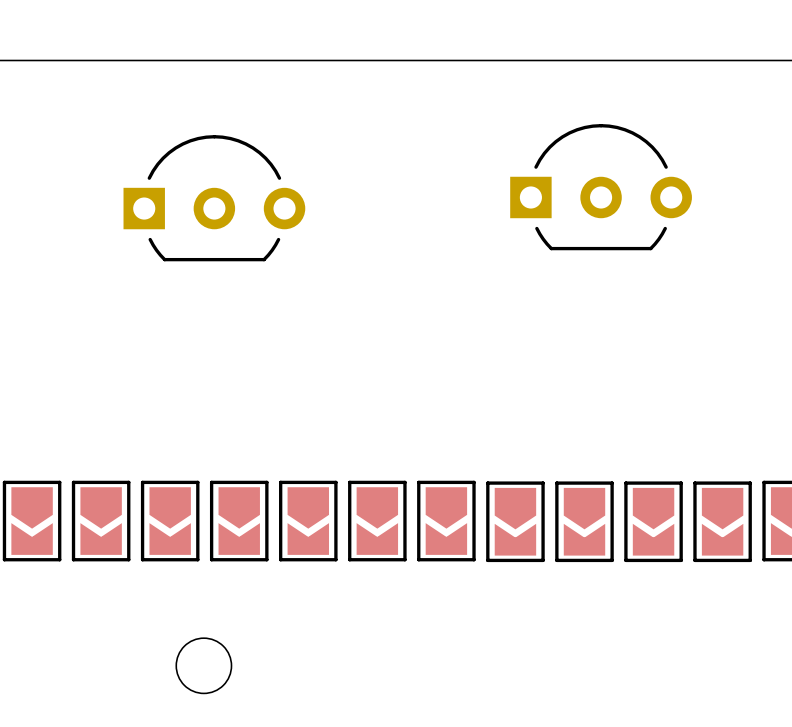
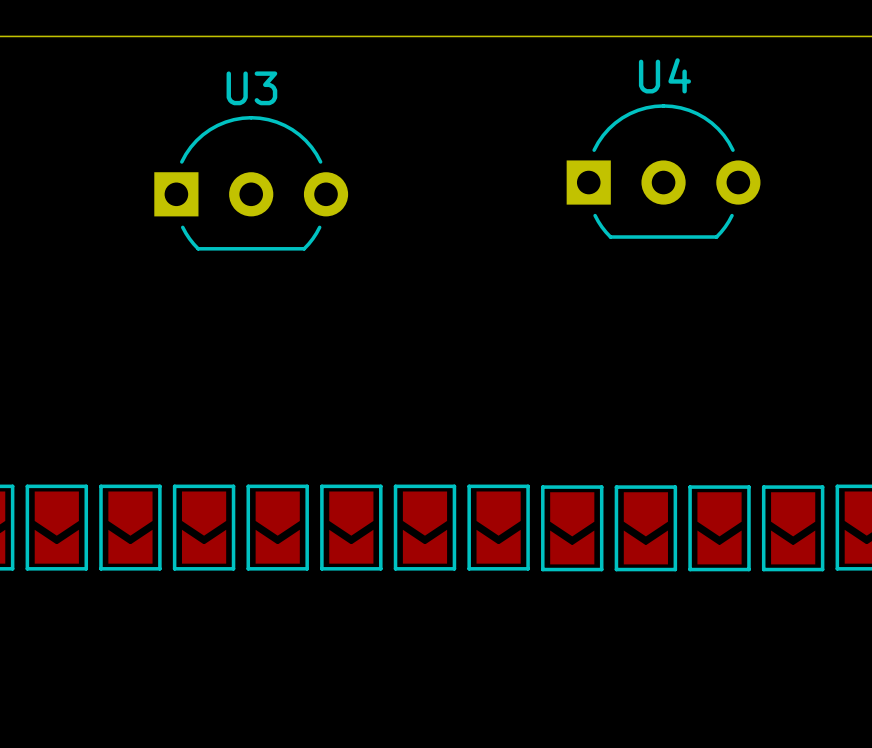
U4 name: none -> U4 (664, 75)
U3 name: none -> U3 (251, 88)
round board edge: [175, 637, 233, 695] -> none

